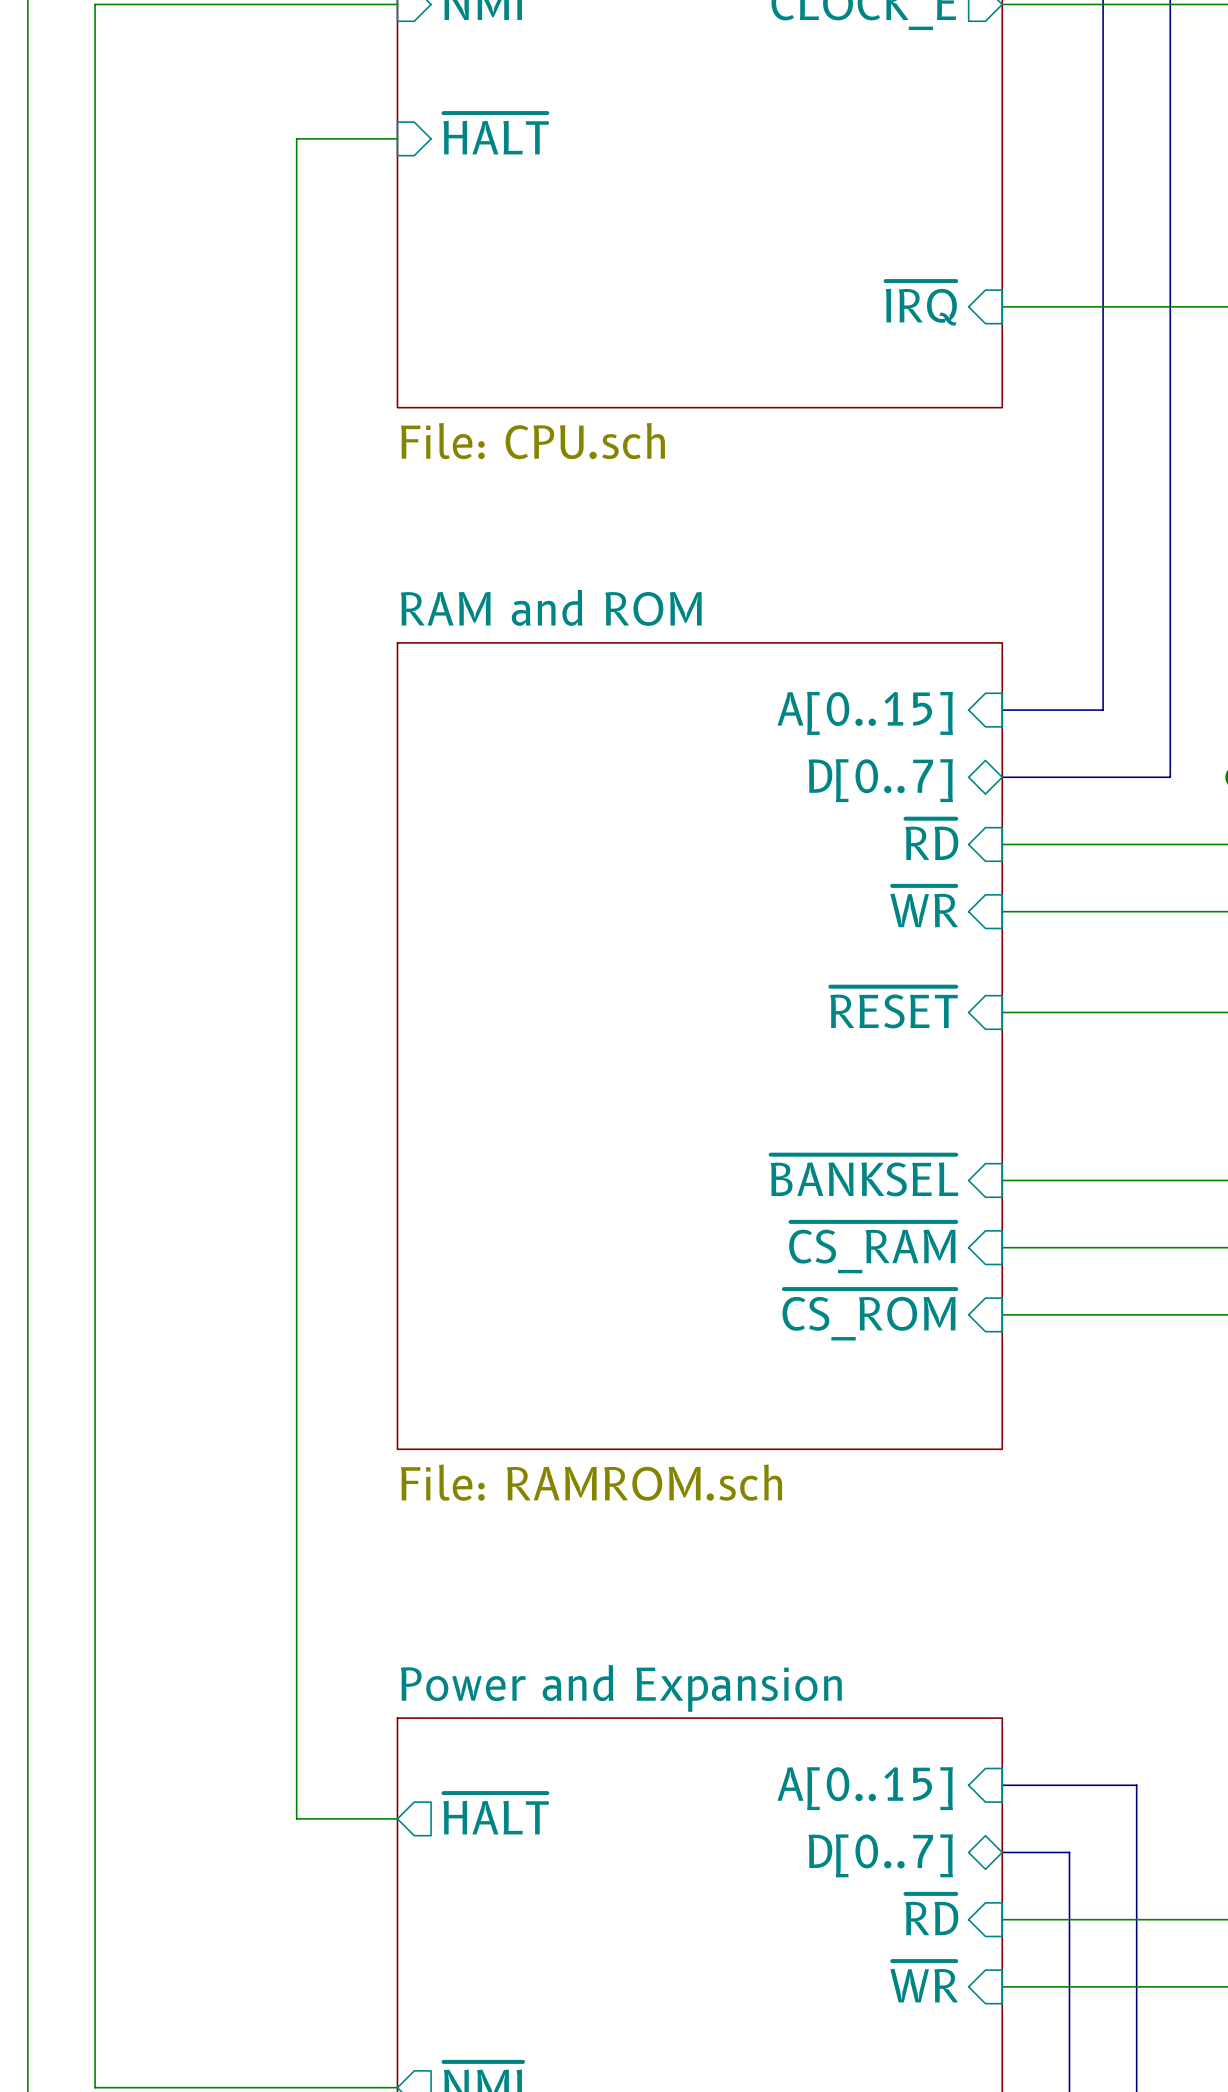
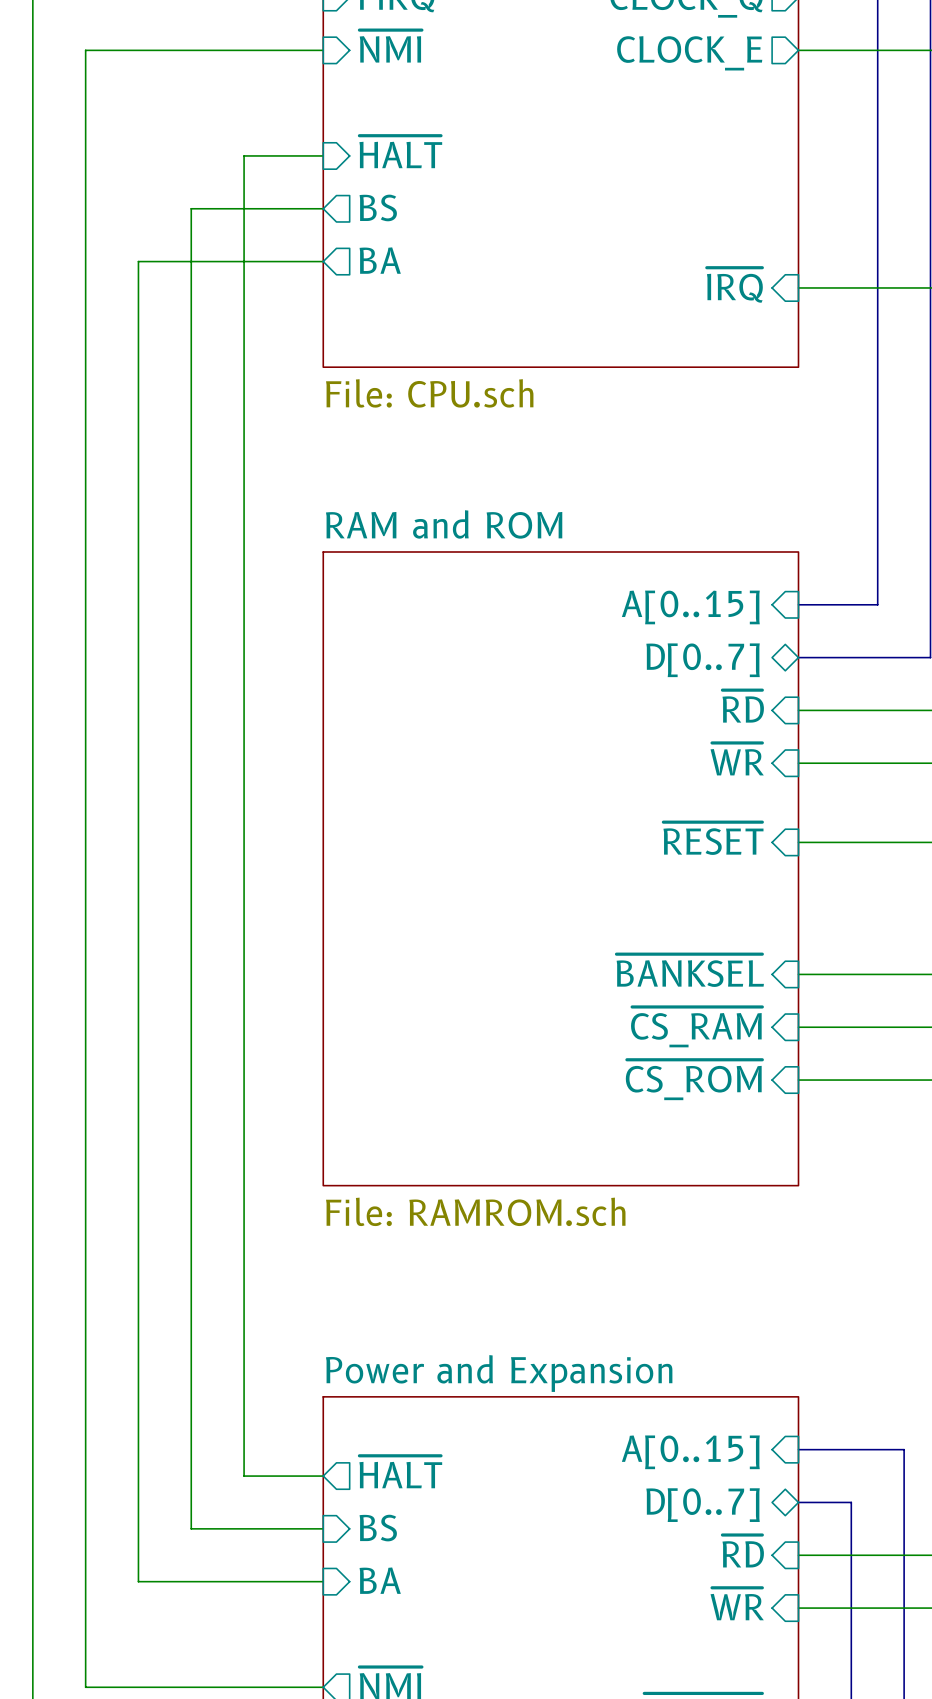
sheet pin: none -> BS (378, 207)
wire: none -> (323, 208) (191, 208) (191, 1528) (323, 1528)
sheet pin: none -> BA (380, 260)
wire: none -> (323, 261) (138, 261) (138, 1581) (323, 1581)
sheet pin: none -> BS (378, 1528)
sheet pin: none -> BA (380, 1580)

